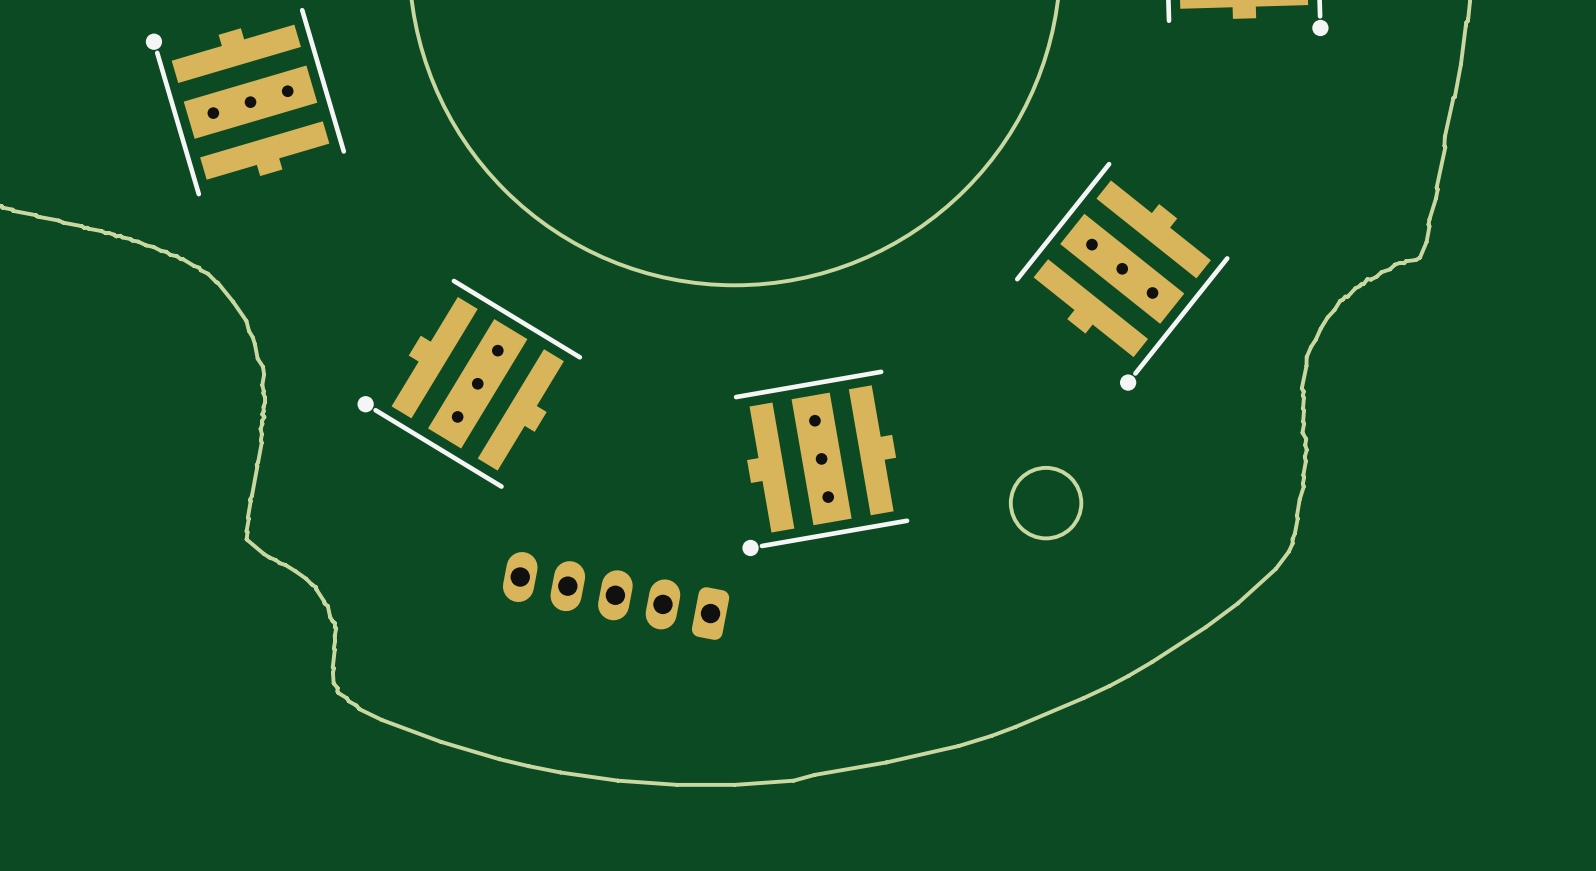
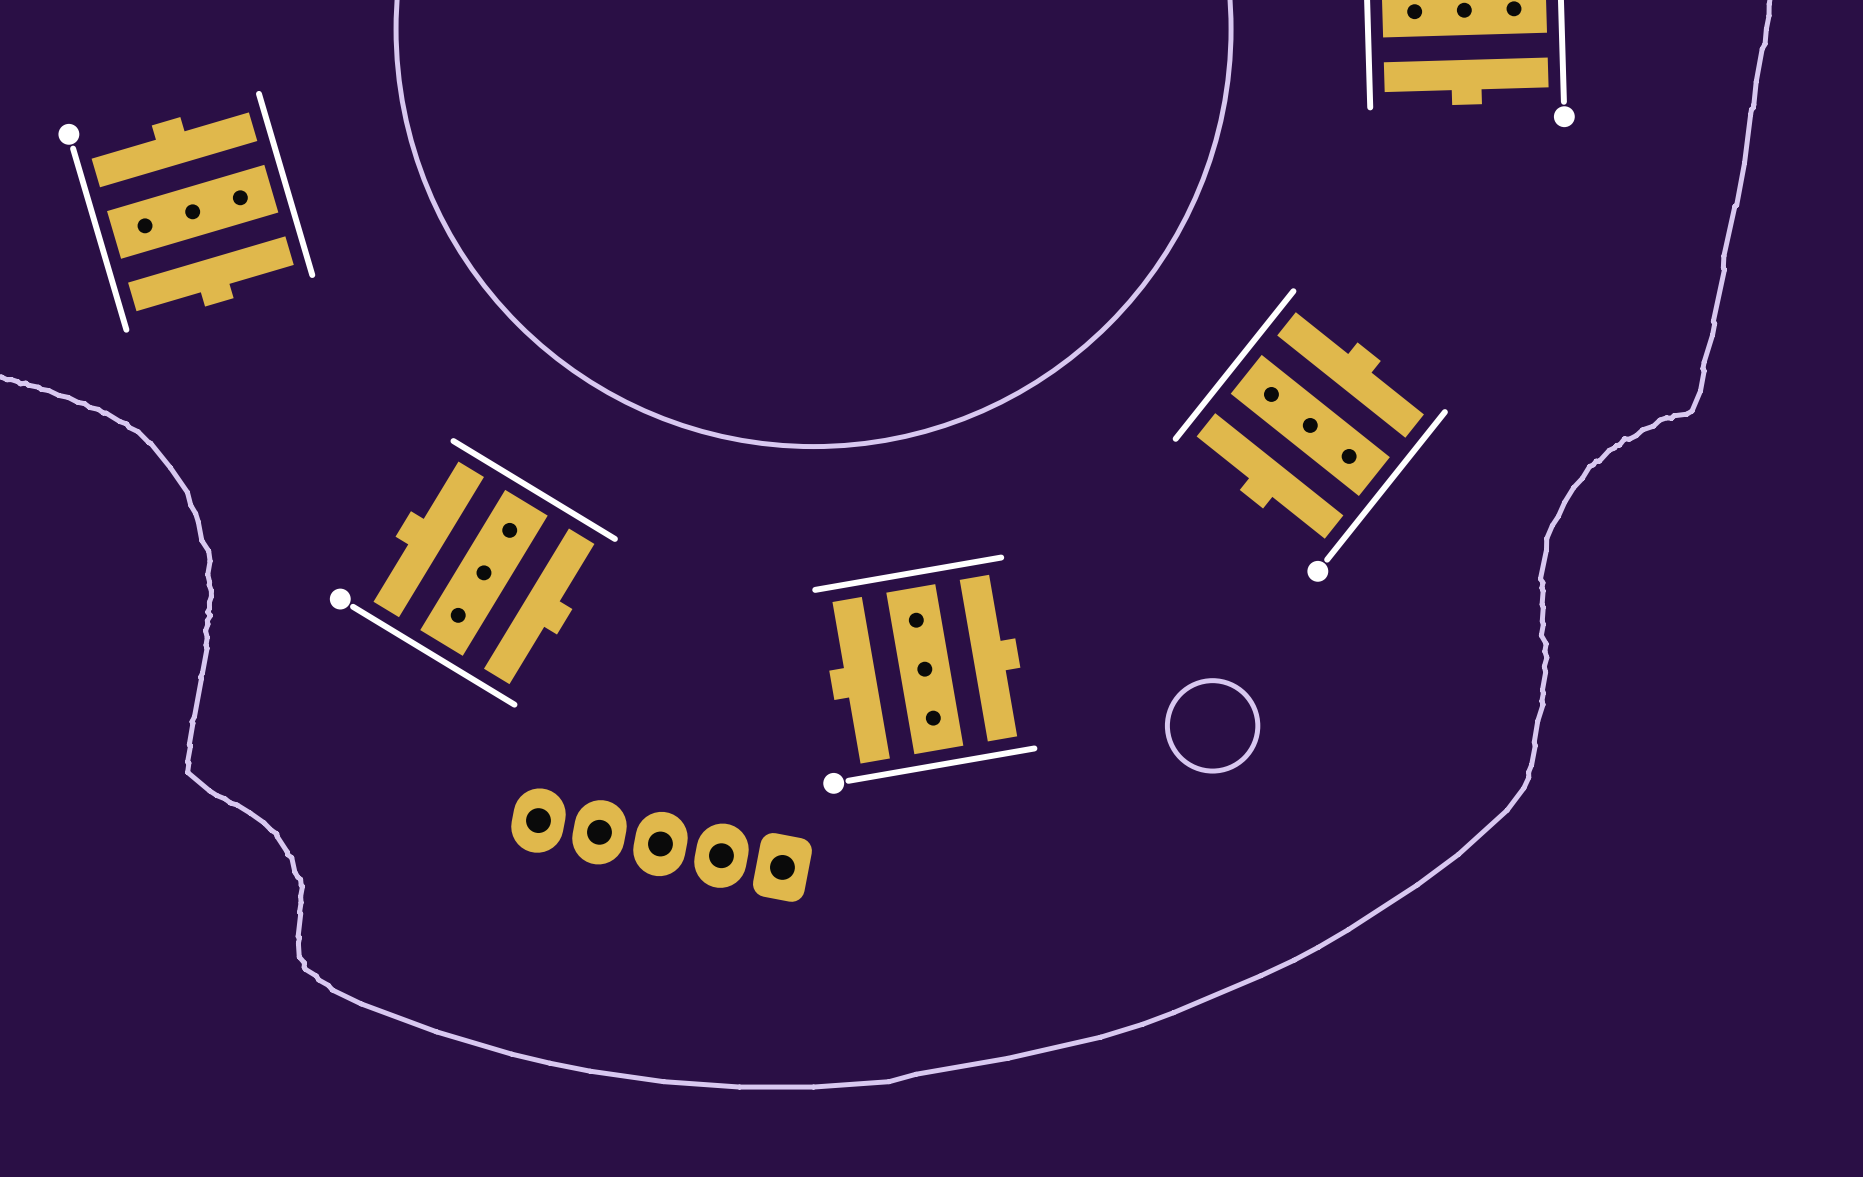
part footprint: [502, 552, 730, 640] -> [511, 788, 812, 902]

